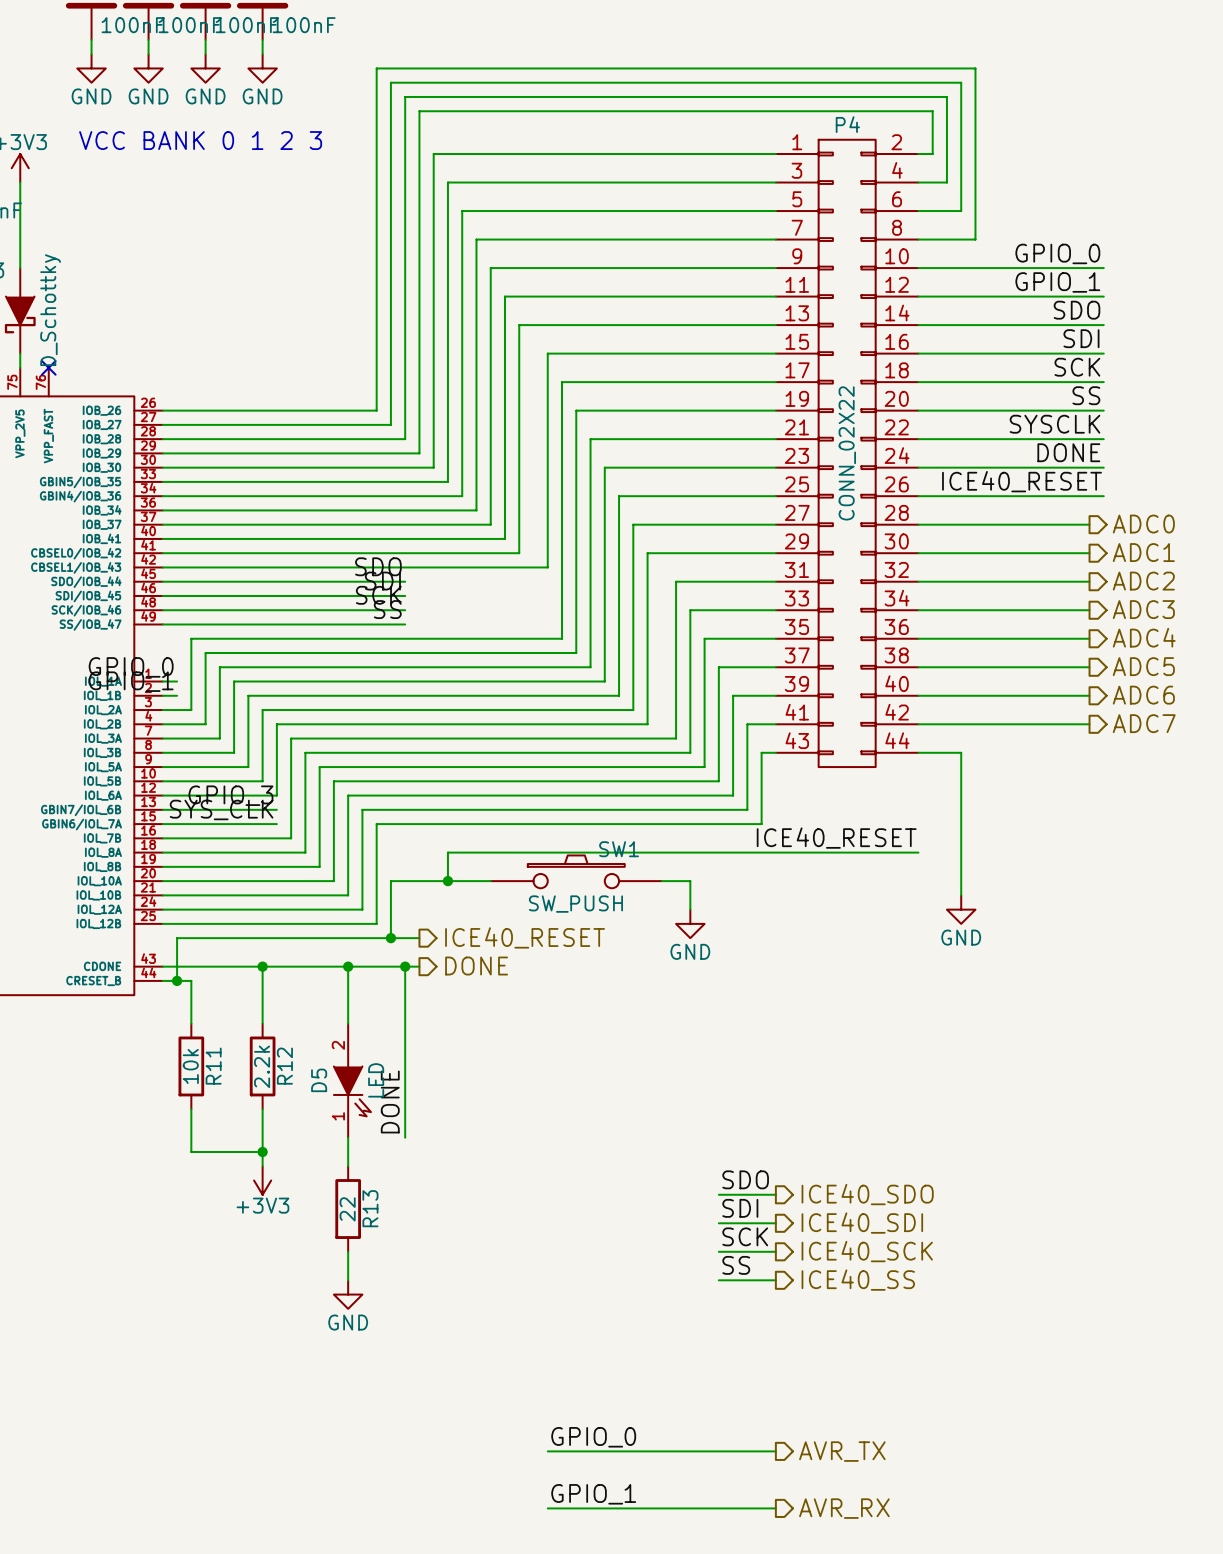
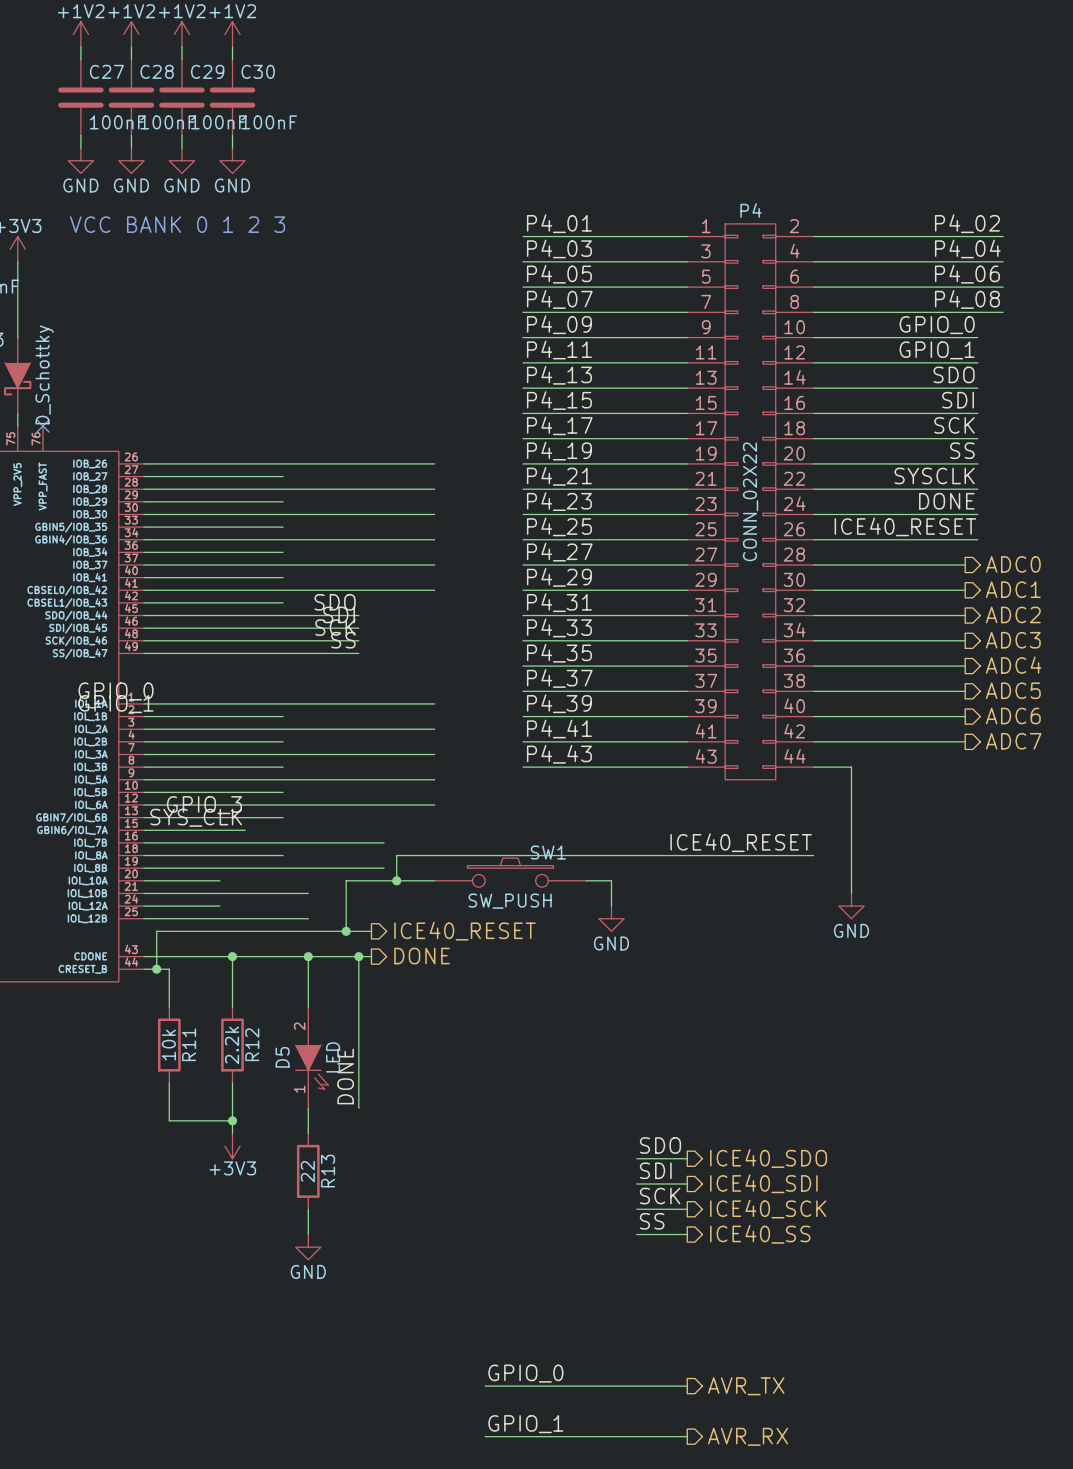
label: none -> P4_01 (559, 223)
label: none -> P4_02 (967, 223)
wire: (590, 154) (433, 154) (433, 467) -> (434, 514) (384, 514)
wire: (932, 154) (932, 111) (419, 111) (419, 453) (319, 453) -> (826, 236) (1003, 236)
label: none -> P4_03 (559, 248)
label: none -> P4_04 (967, 248)
wire: (590, 182) (447, 182) (447, 481) (319, 481) -> none
wire: (946, 182) (946, 96) (405, 96) (405, 439) -> (434, 489) (358, 489)
wire: none -> (838, 261) (1003, 261)
label: none -> P4_05 (559, 274)
label: none -> P4_06 (967, 274)
wire: (590, 211) (462, 211) (462, 496) -> (434, 539) (409, 539)
wire: (961, 211) (961, 82) (390, 82) (390, 424) (319, 424) -> (851, 287) (1003, 287)
label: none -> P4_07 (559, 299)
label: none -> P4_08 (967, 299)
wire: (590, 239) (476, 239) (476, 510) (319, 510) -> none
wire: (975, 239) (975, 68) (376, 68) (376, 410) -> (434, 463) (333, 463)
wire: none -> (864, 312) (1003, 312)
label: none -> P4_09 (559, 324)
wire: (590, 268) (490, 268) (490, 524) -> none
label: none -> P4_11 (559, 350)
wire: (590, 296) (504, 296) (504, 538) (319, 538) -> none
label: none -> P4_13 (559, 375)
wire: (590, 325) (519, 325) (519, 553) (490, 553) -> none
label: none -> P4_15 (559, 400)
wire: (590, 353) (547, 353) (547, 567) (319, 567) -> none
label: none -> P4_17 (559, 425)
wire: (590, 382) (562, 382) (562, 638) (191, 638) (191, 710) -> (232, 729) (169, 729)
label: none -> P4_19 (559, 451)
wire: (590, 410) (576, 410) (576, 653) (205, 653) (205, 724) -> none
label: none -> P4_21 (559, 476)
wire: (590, 439) (590, 667) (219, 667) (219, 738) -> none
label: none -> P4_23 (559, 501)
wire: (604, 467) (604, 681) (490, 681) -> (535, 514) (523, 514)
label: none -> P4_25 (559, 526)
wire: (619, 496) (619, 695) -> (548, 539) (523, 539)
label: none -> P4_27 (559, 552)
wire: (633, 524) (633, 710) (490, 710) -> (560, 565) (523, 565)
label: none -> P4_29 (559, 577)
wire: (647, 553) (647, 724) -> (573, 590) (523, 590)
label: none -> P4_31 (559, 602)
wire: (676, 581) (676, 738) (490, 738) -> (598, 615) (523, 615)
label: none -> P4_33 (559, 627)
wire: none -> (523, 640) (611, 640)
wire: (690, 610) (690, 752) -> (674, 767) (611, 767)
label: none -> P4_35 (559, 653)
wire: (704, 638) (704, 767) (490, 767) -> (624, 666) (523, 666)
label: none -> P4_37 (559, 678)
wire: (718, 667) (718, 781) (333, 781) (333, 881) (248, 881) -> (636, 691) (523, 691)
wire: (234, 681) (234, 752) -> (207, 703) (156, 703)
label: none -> P4_39 (559, 703)
wire: (248, 695) (248, 767) -> (219, 716) (156, 716)
wire: (319, 695) (590, 695) -> none
wire: (733, 695) (733, 795) (490, 795) -> (649, 716) (548, 716)
label: none -> P4_41 (559, 728)
wire: (262, 710) (262, 781) -> (283, 792) (232, 792)
wire: (276, 724) (276, 795) -> (245, 741) (181, 741)
wire: (319, 724) (590, 724) -> none
wire: (747, 724) (747, 809) (362, 809) (362, 909) (248, 909) -> (662, 741) (573, 741)
wire: (291, 738) (291, 838) -> (257, 754) (194, 754)
label: none -> P4_43 (559, 754)
wire: none -> (207, 767) (270, 767)
wire: (305, 752) (305, 852) -> (283, 855) (270, 855)
wire: (319, 752) (590, 752) -> none
wire: (761, 752) (761, 824) (376, 824) (376, 923) (348, 923) -> none
wire: (319, 767) (319, 866) -> (283, 779) (219, 779)
wire: (348, 795) (348, 895) -> (308, 805) (245, 805)
wire: none -> (245, 817) (283, 817)
wire: none -> (257, 842) (384, 842)
wire: none -> (283, 868) (384, 868)

